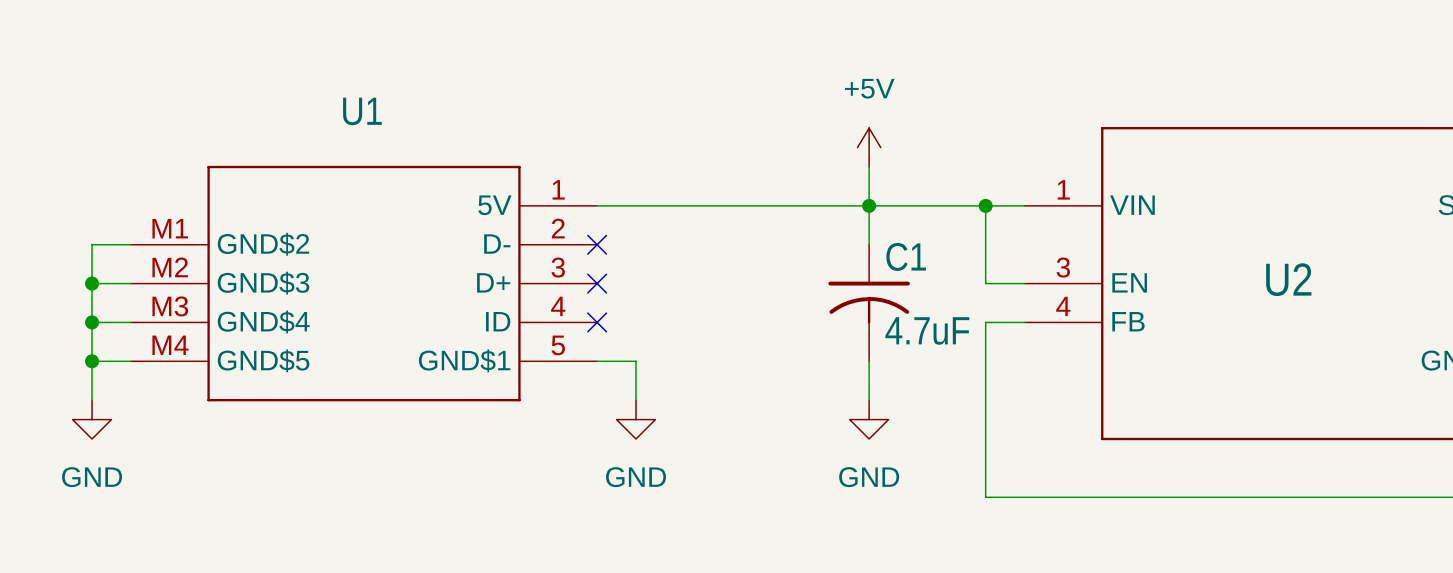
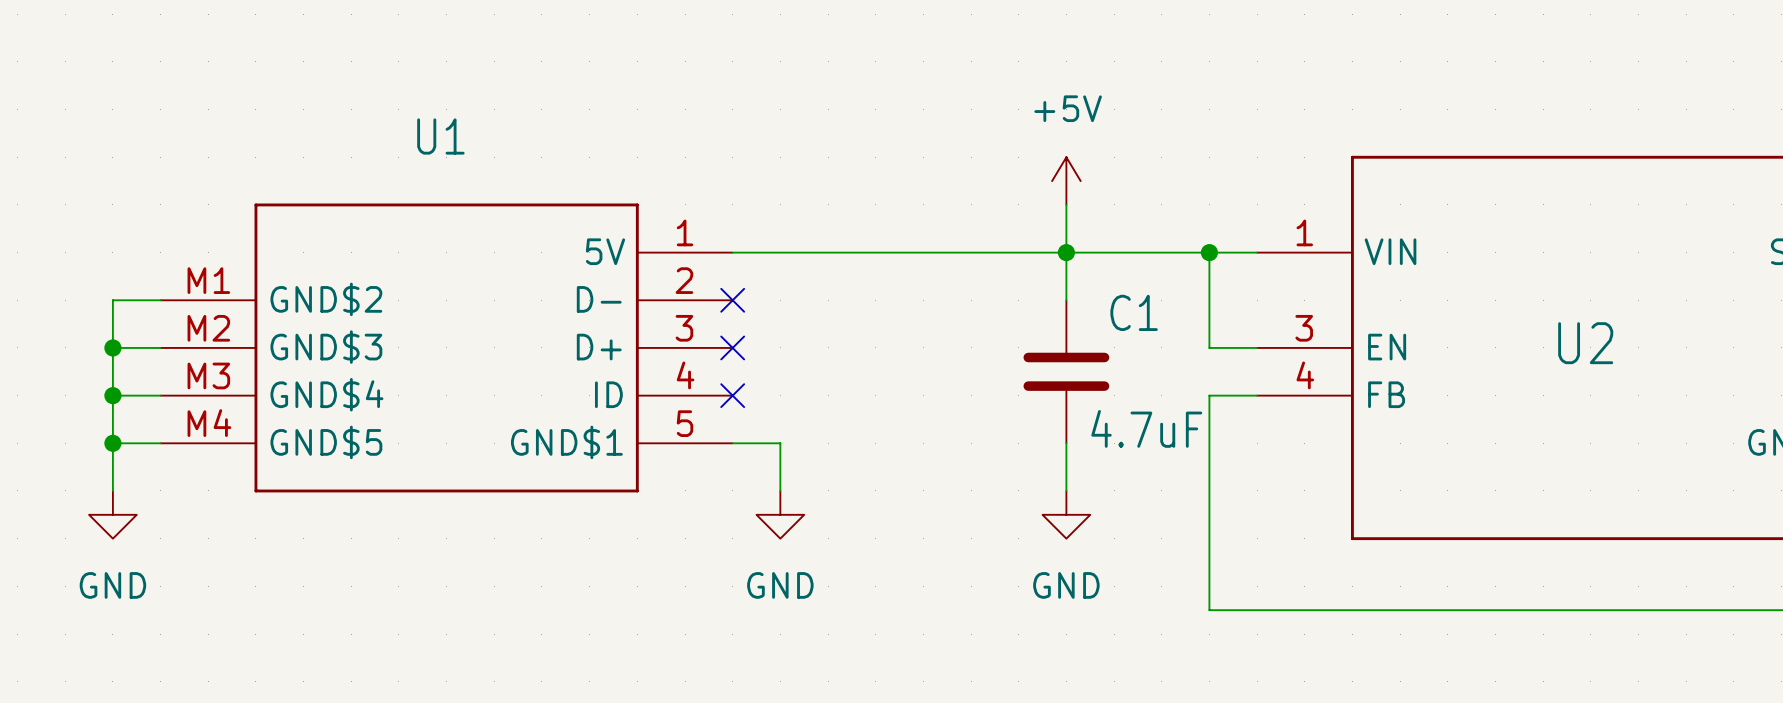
C1 symbol: [828, 244, 910, 362] -> [1023, 300, 1110, 444]
C1 name position: C1 (906, 256) -> C1 (1134, 312)
C1 value position: 4.7uF (927, 330) -> 4.7uF (1146, 428)

